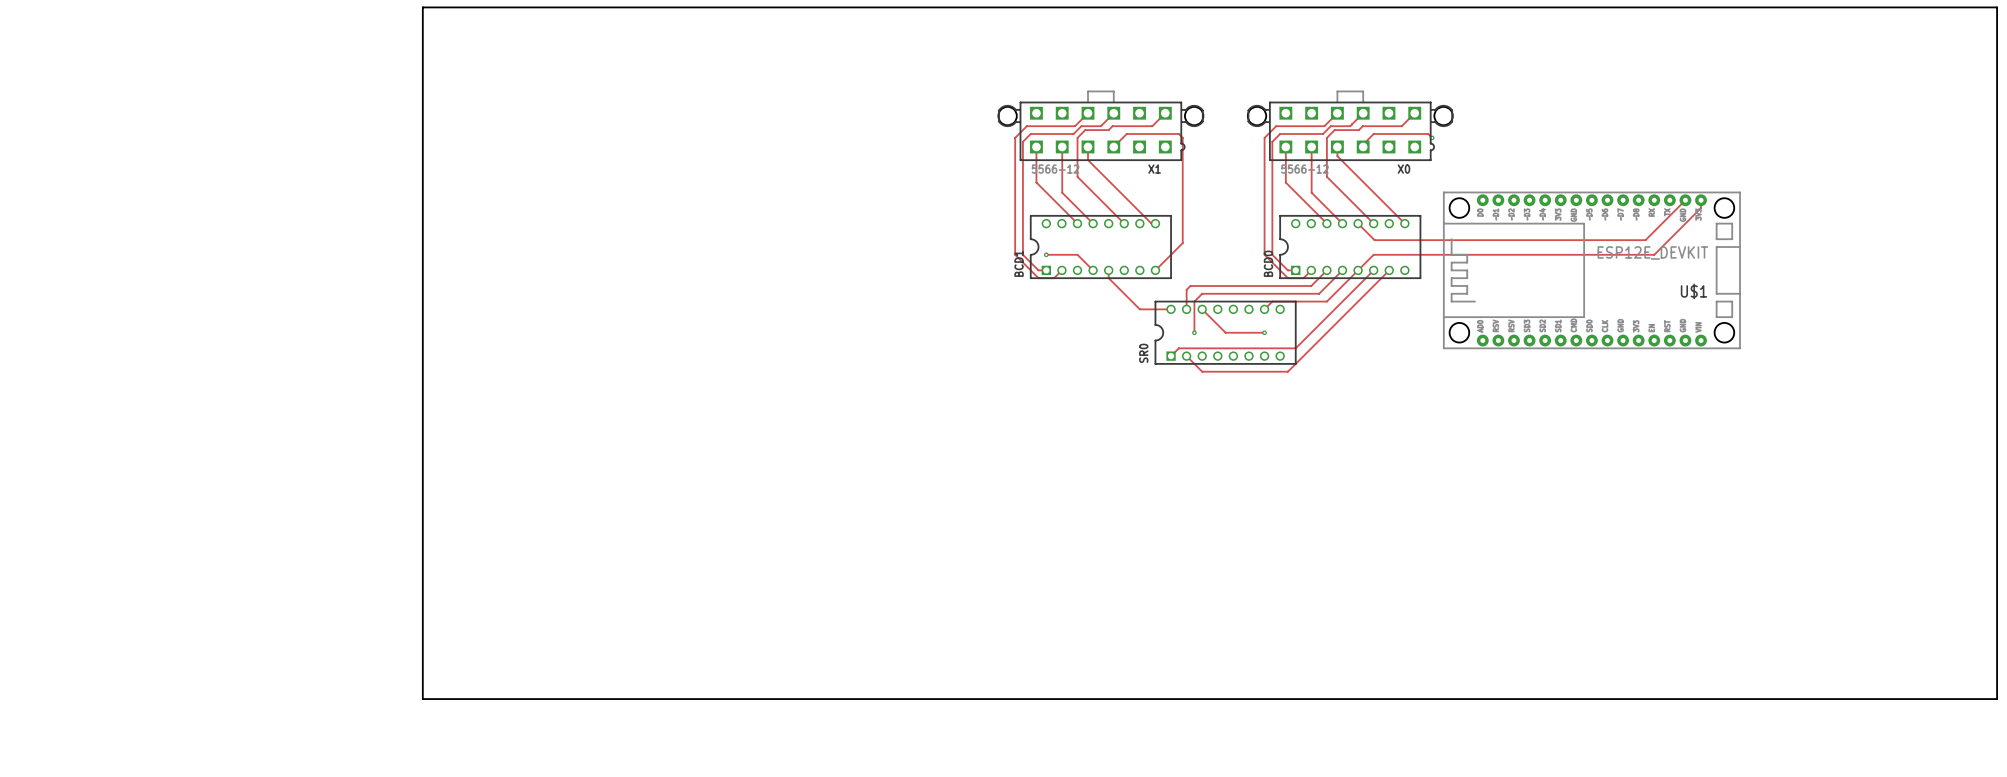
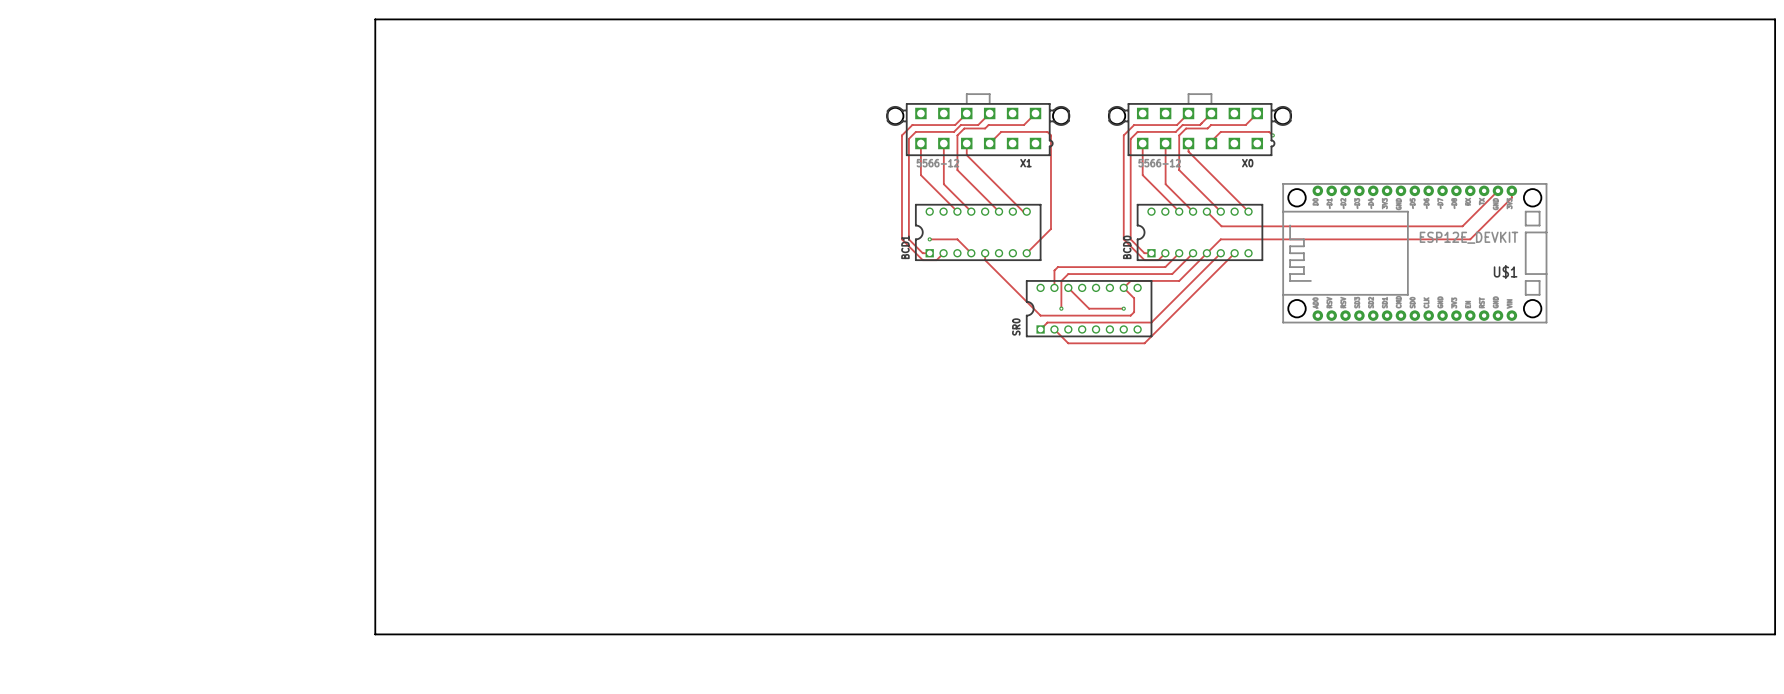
track: (1139, 309) (1171, 309) -> (1012, 287) (1040, 315) (1130, 315) (1134, 312) (1134, 298) (1123, 287)

